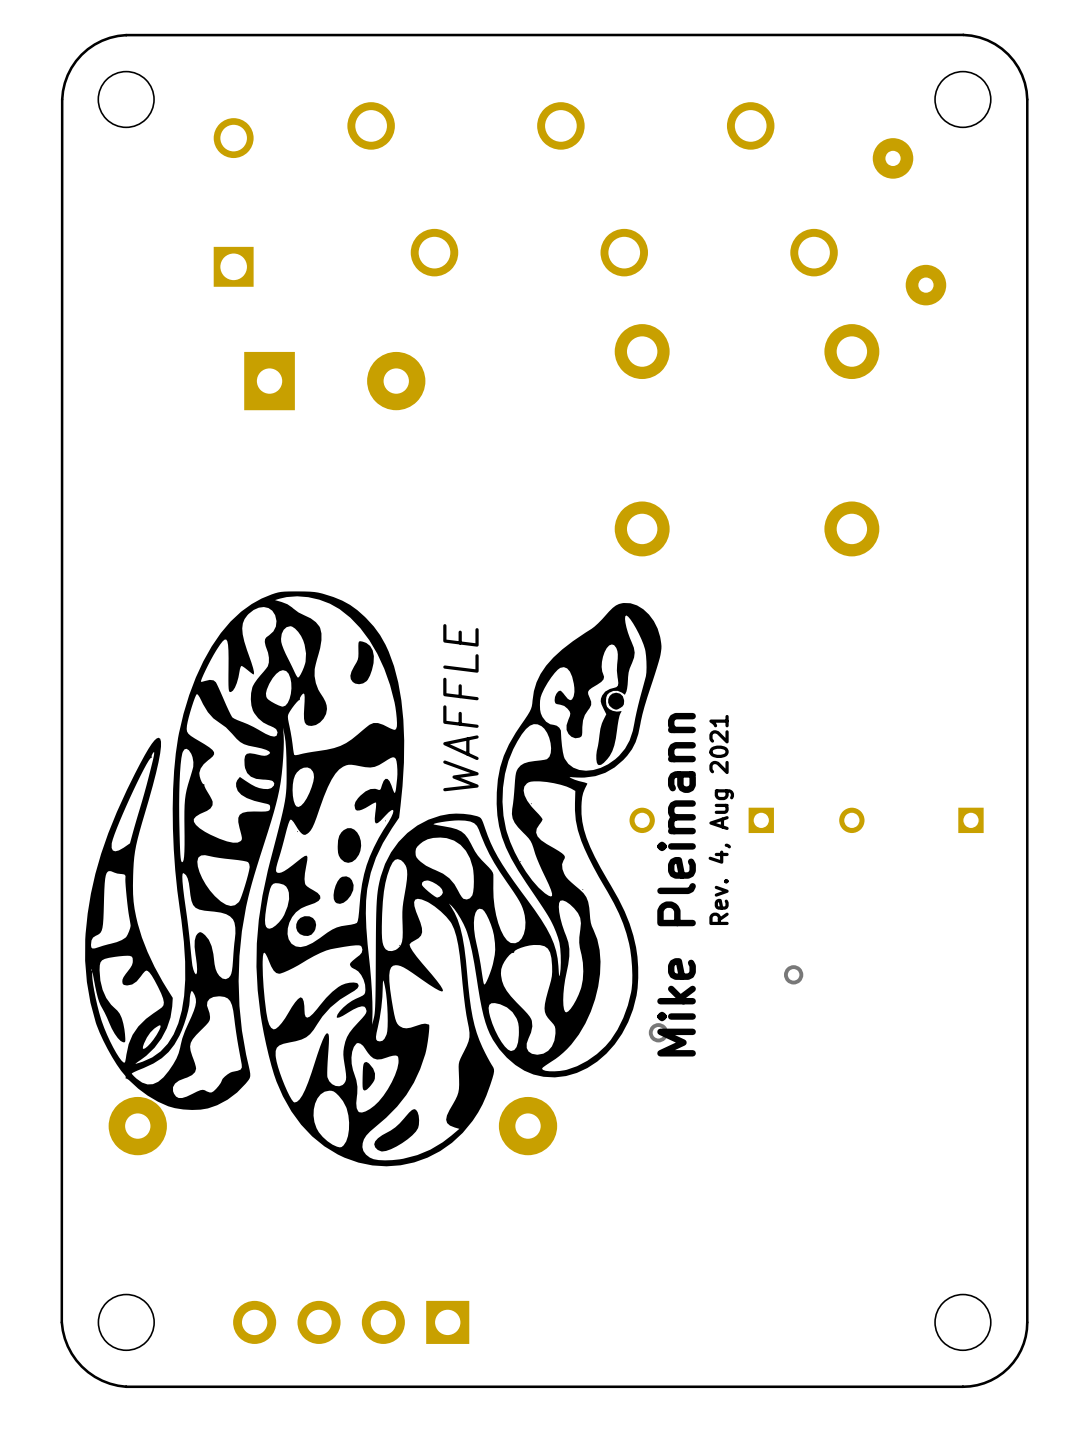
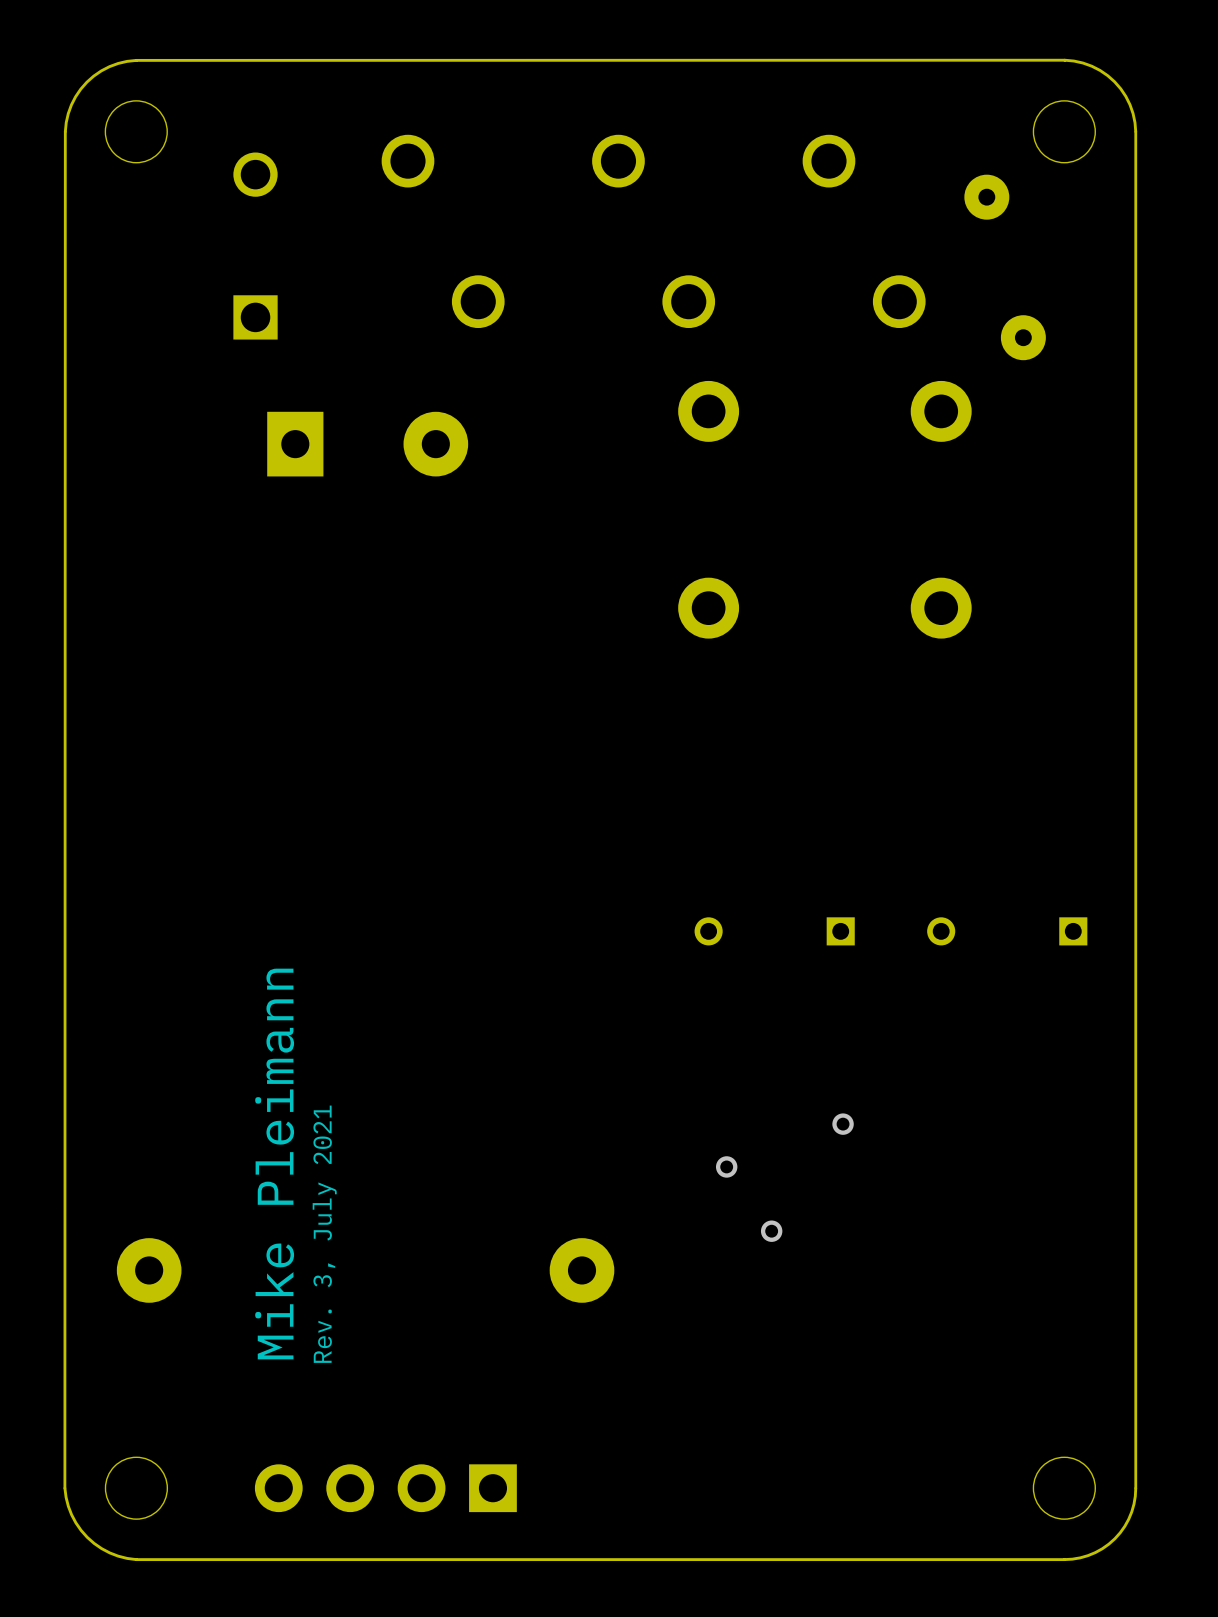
drawing: [85, 591, 662, 1167] -> none
text: Rev. 4, Aug 2021 (721, 819) -> none
text position: Mike Pleimann (676, 884) -> Mike Pleimann (274, 1164)
via position: (793, 974) -> (843, 1124)
via: none -> (771, 1231)
text: none -> Rev. 3, July 2021 (324, 1234)

